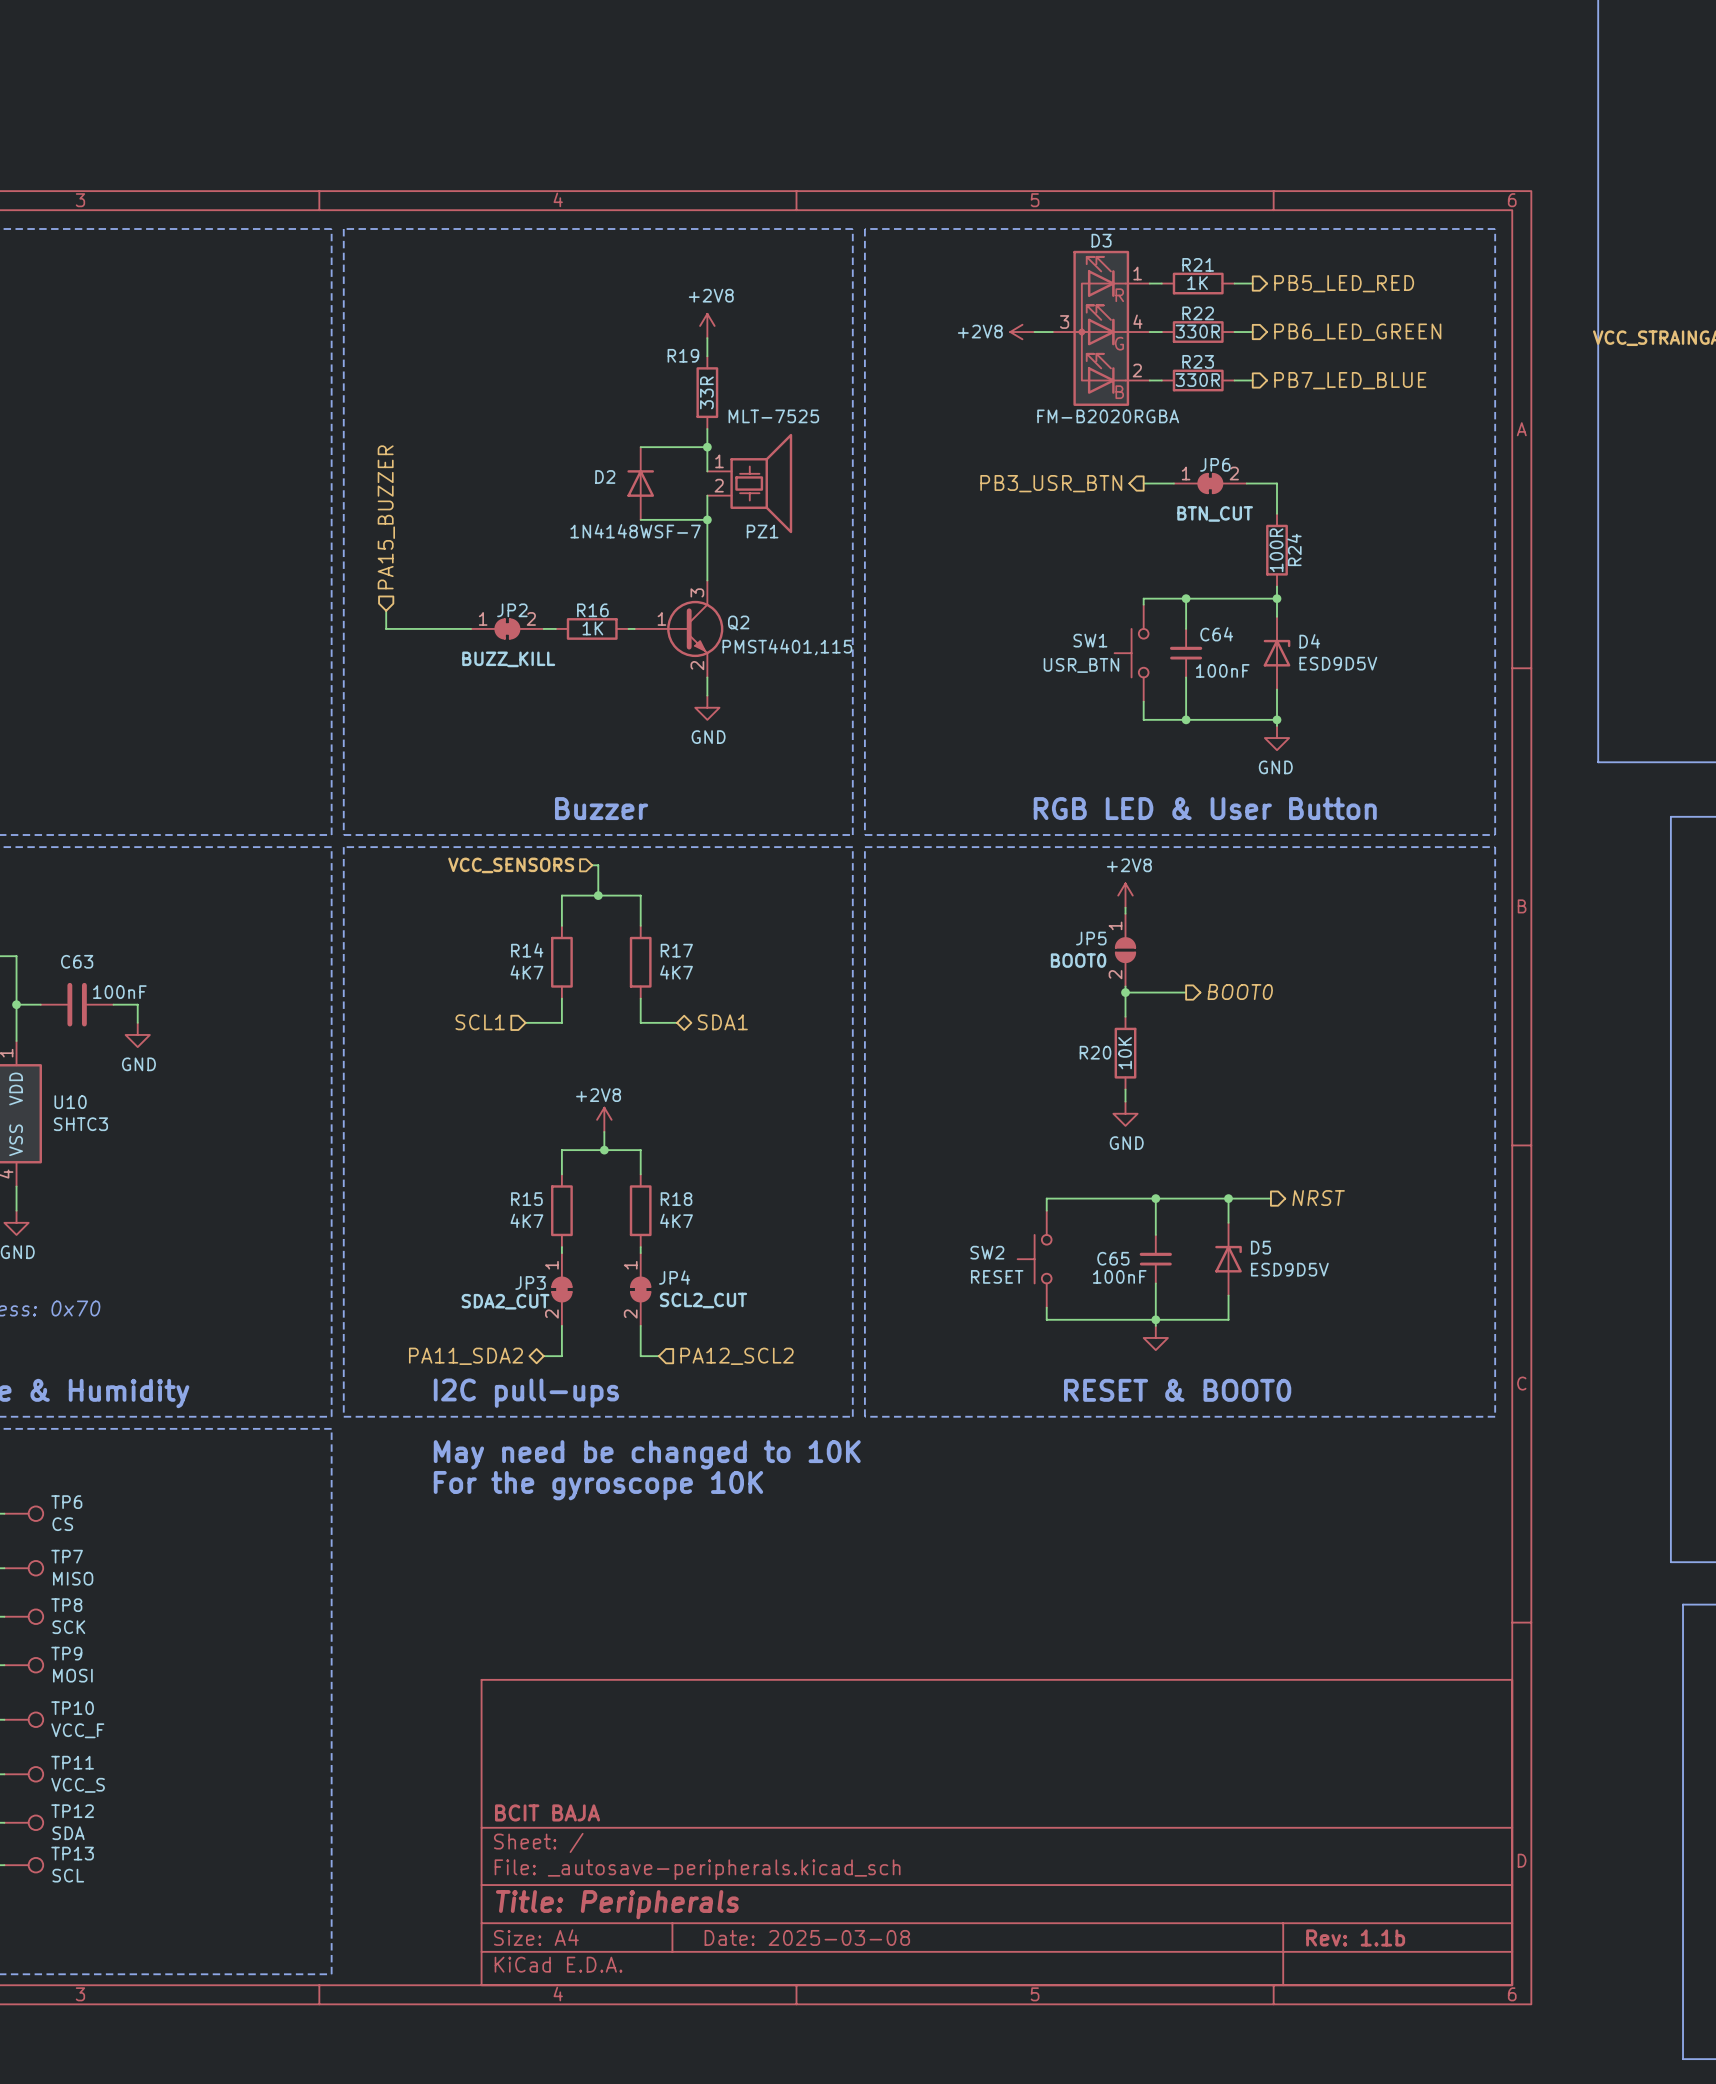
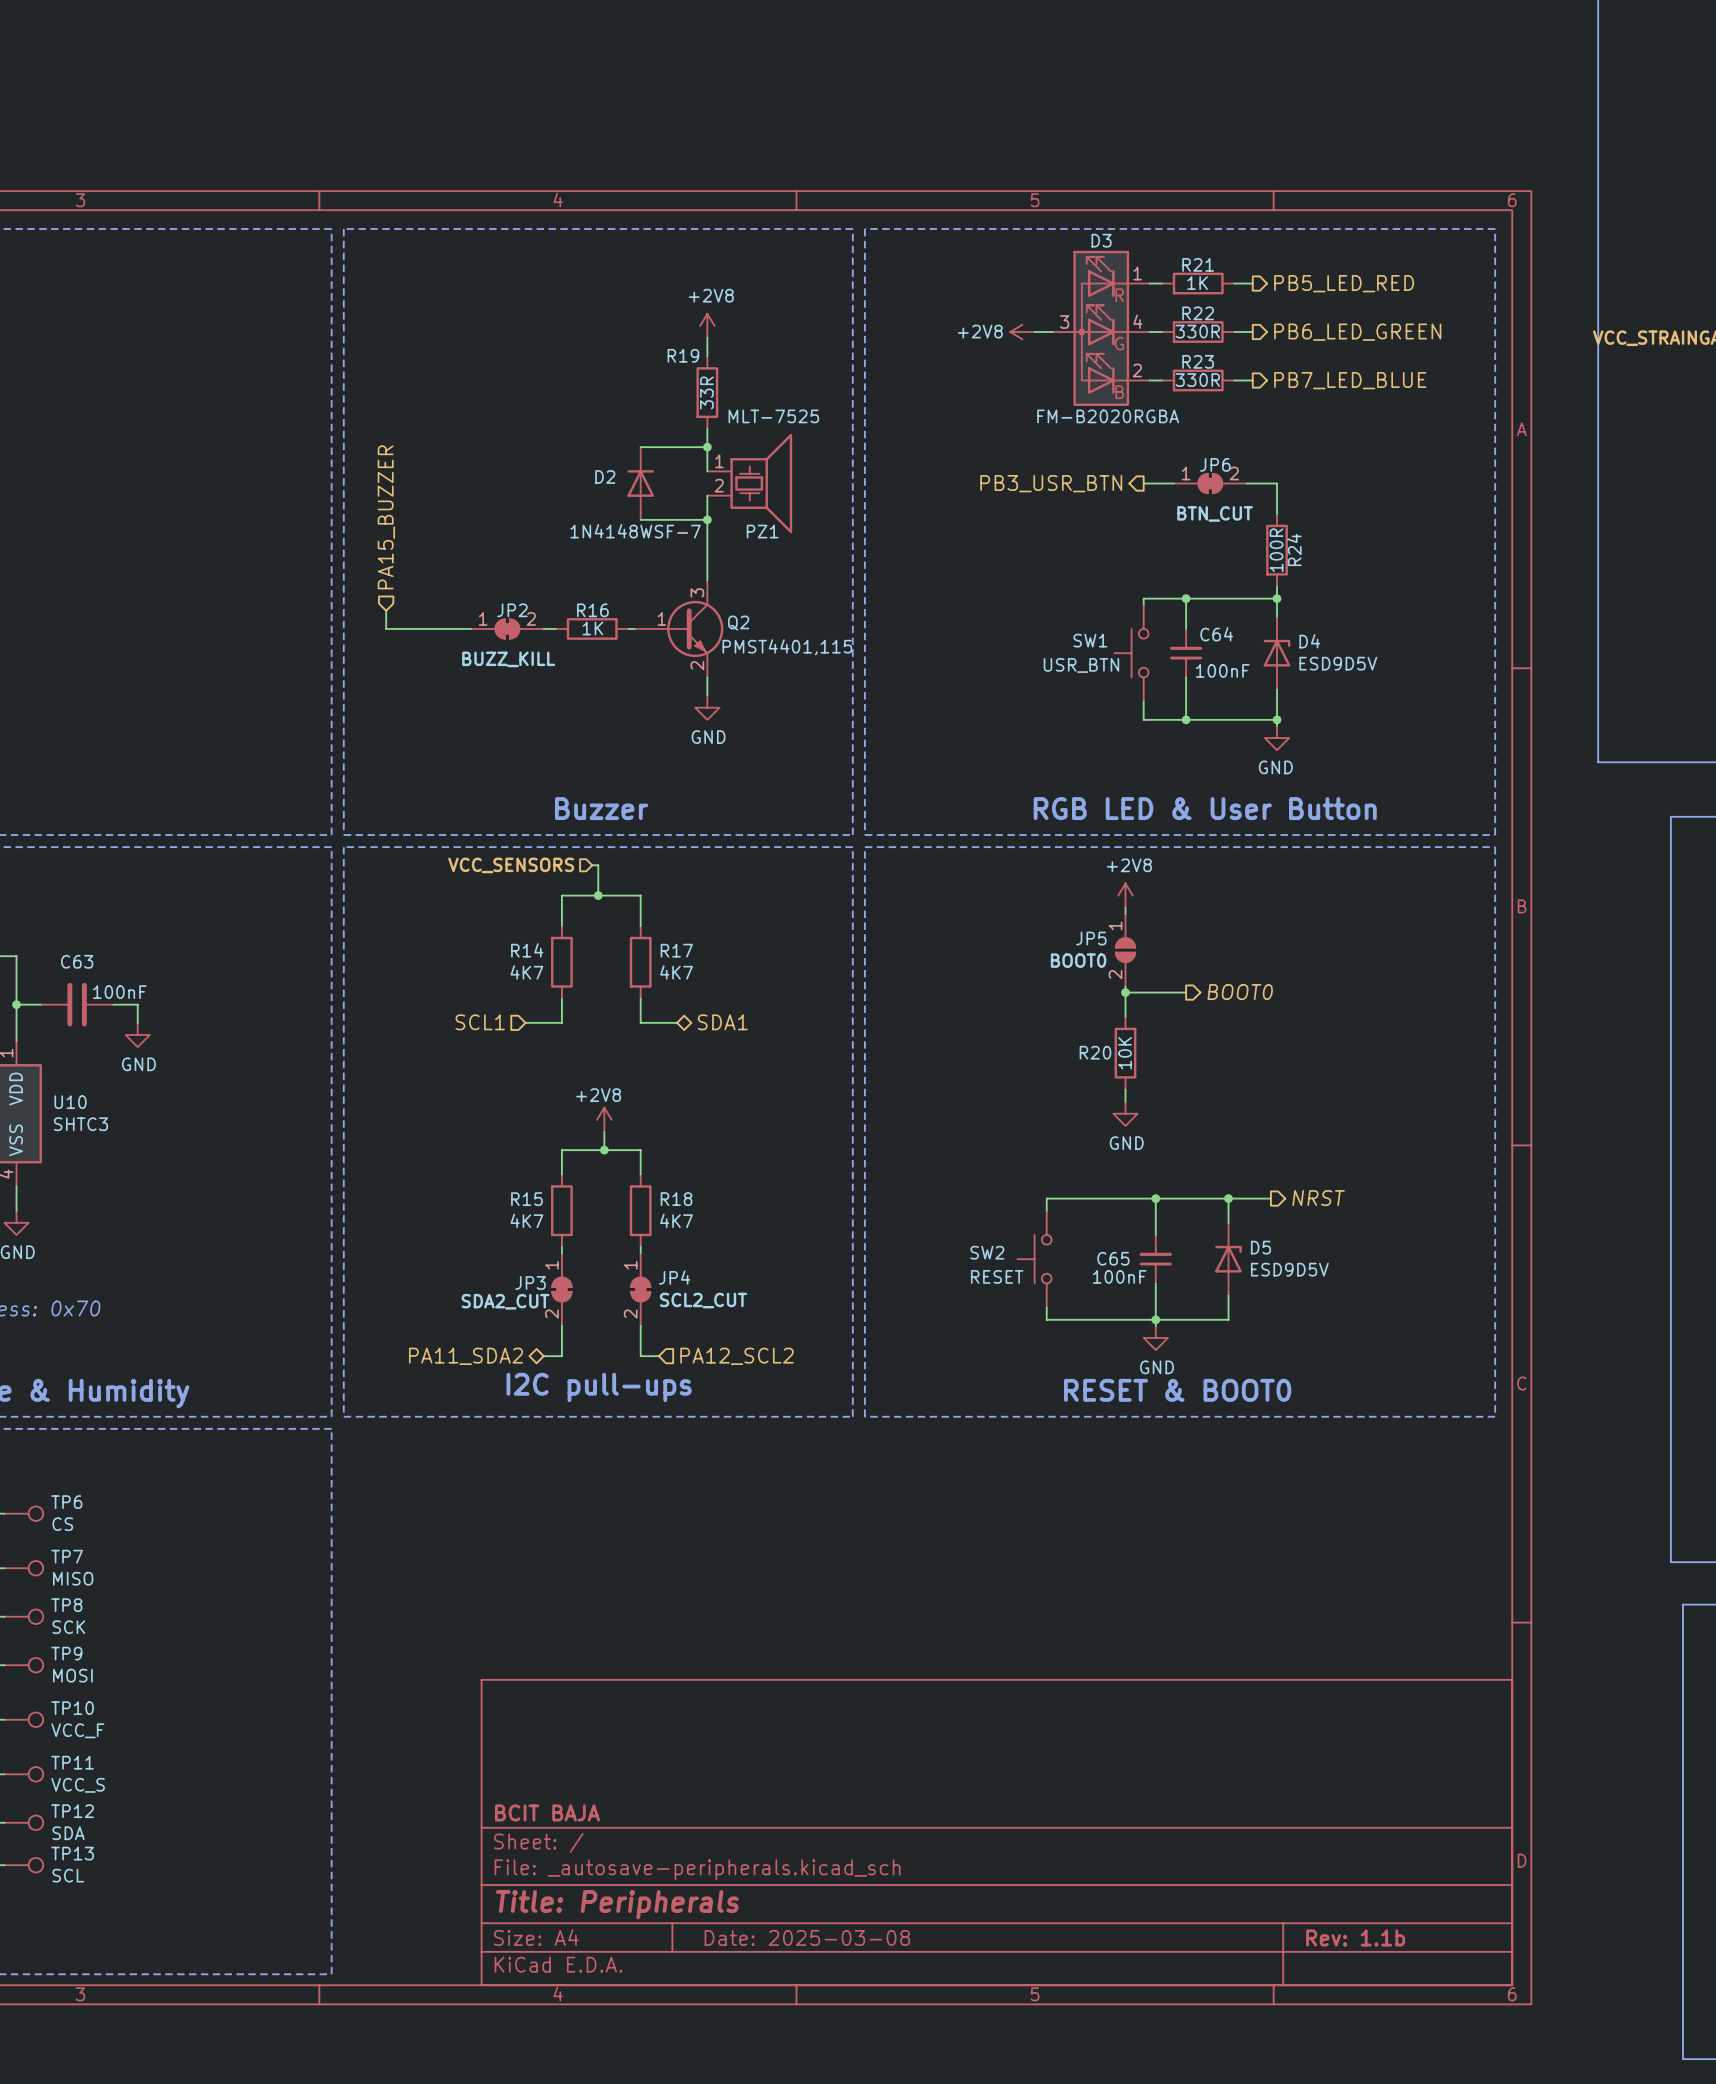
power symbol text: none -> GND (1157, 1367)
text position: I2C pull-ups (526, 1393) -> I2C pull-ups (599, 1387)
text: May need be changed to 10K (647, 1454) -> none
text: For the gyroscope 10K (598, 1485) -> none

